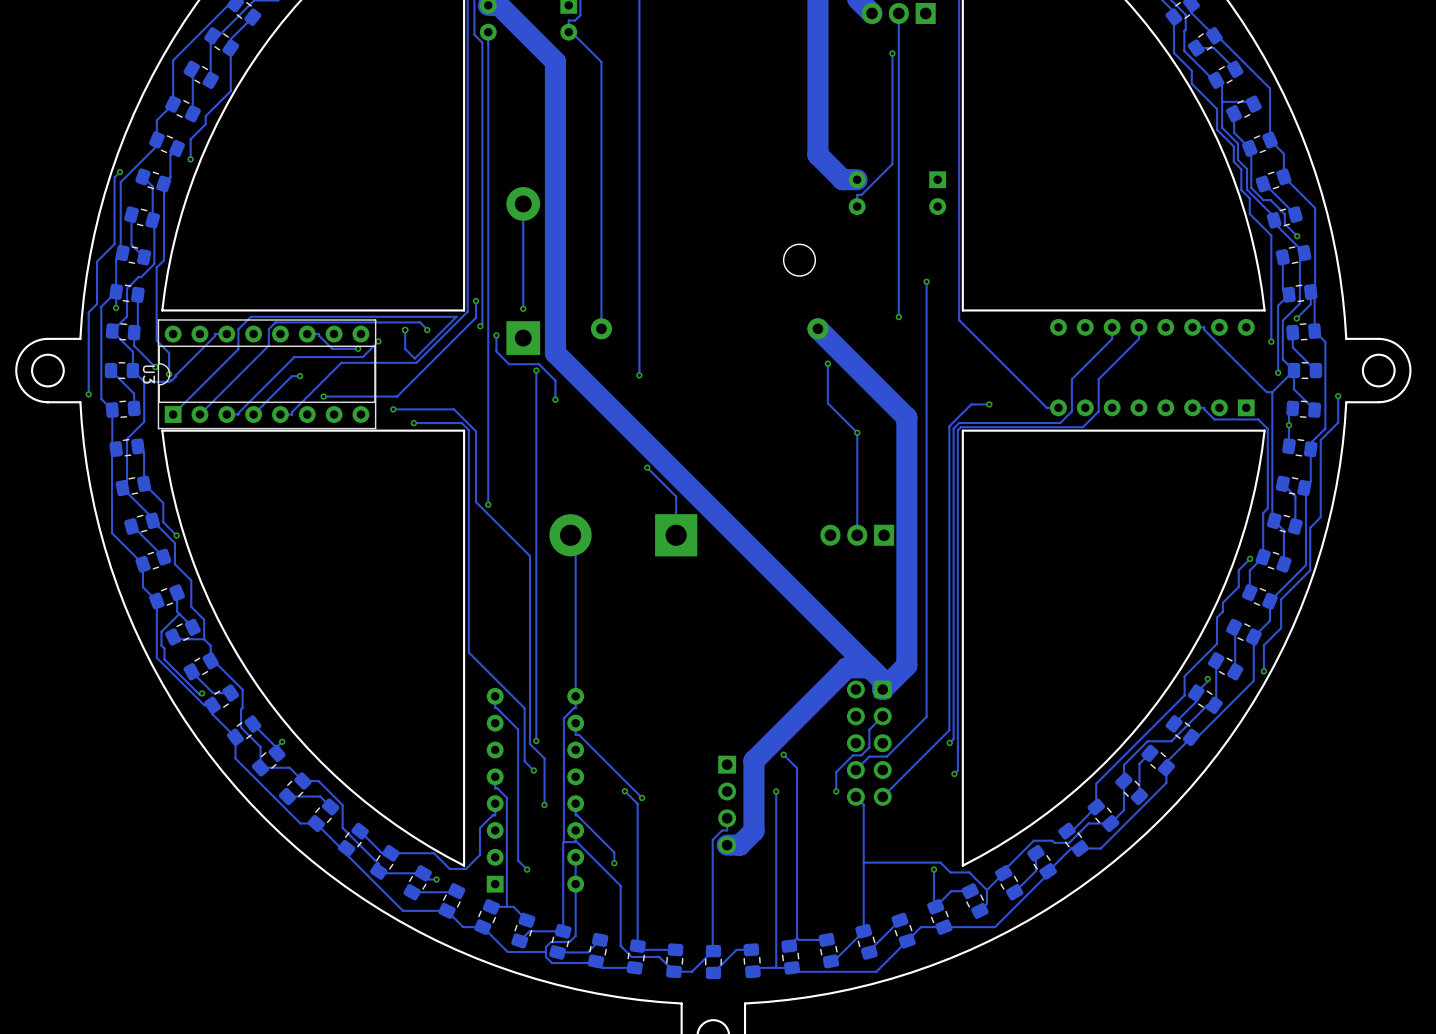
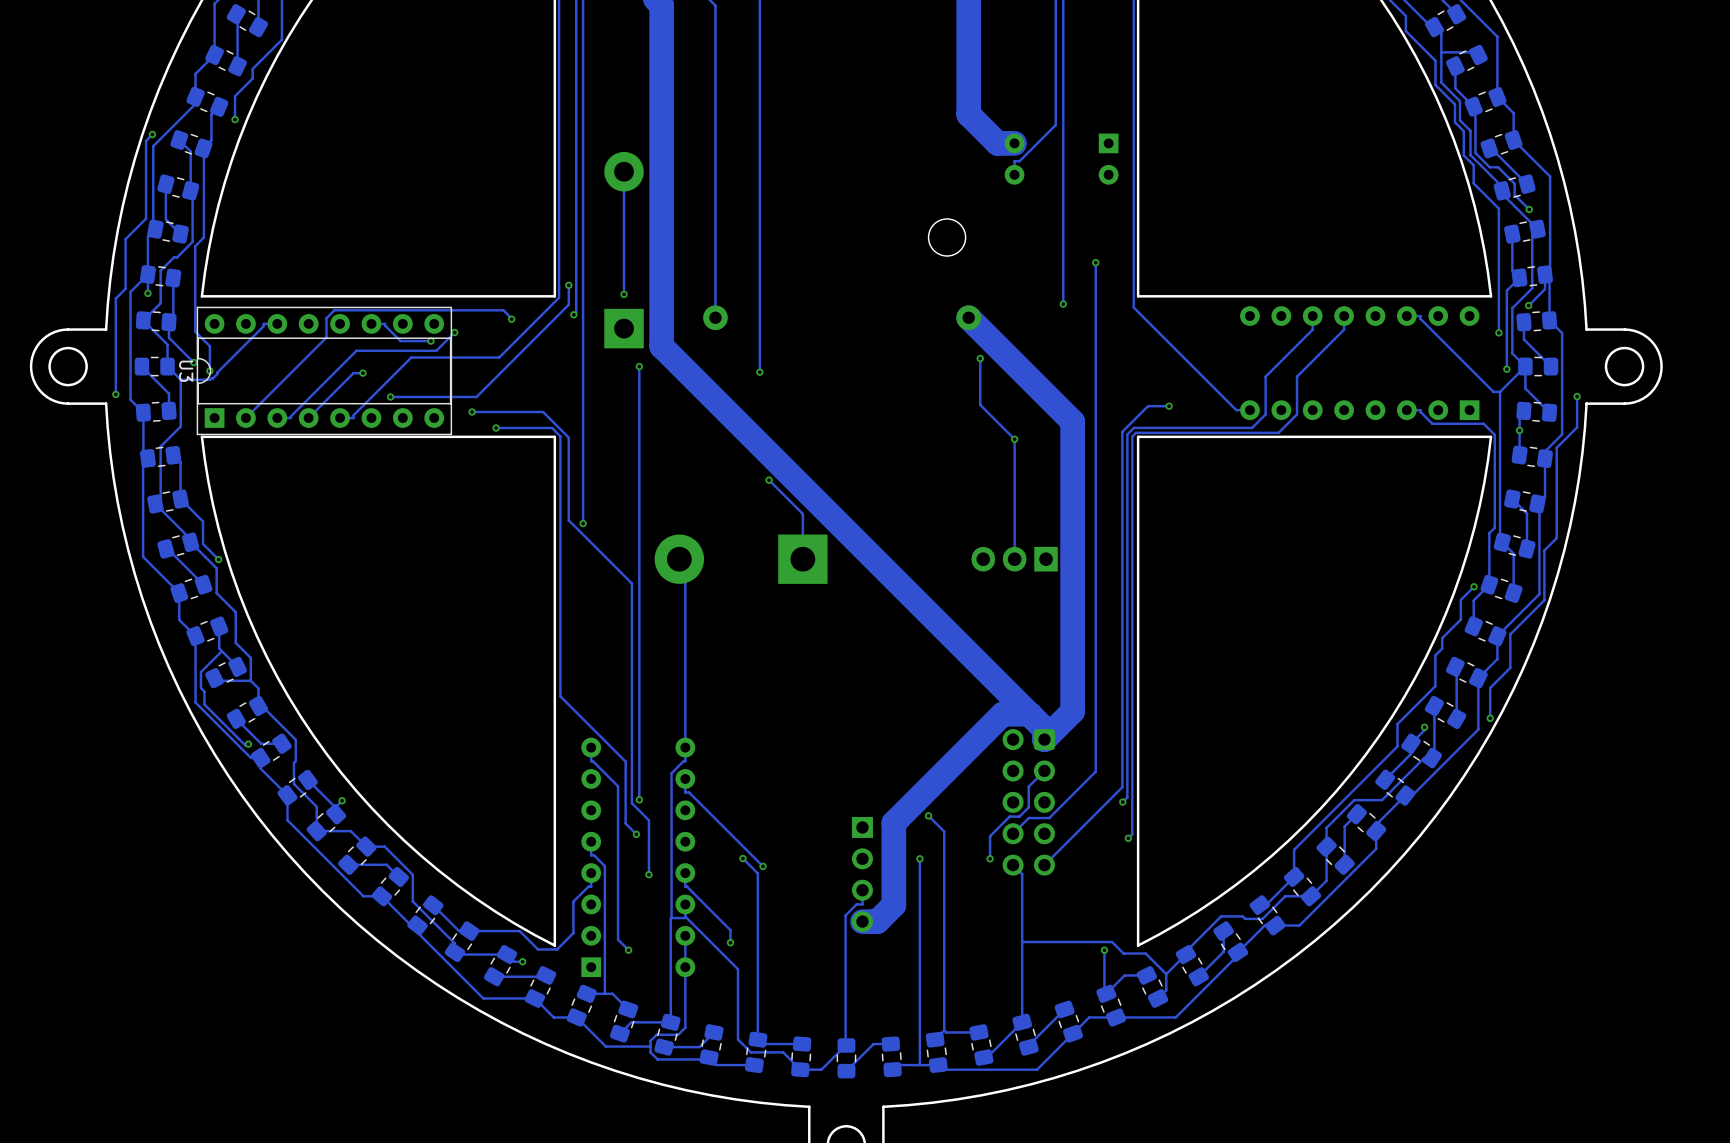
track: (405, 330) (405, 348) (414, 358) (456, 316) (250, 316) (238, 329) (238, 349) (173, 414) -> none
via: (405, 330) -> none
track: (496, 335) (496, 351) (509, 364) (538, 364) (555, 380) (555, 399) -> none
via: (496, 335) -> none
via: (555, 399) -> none

